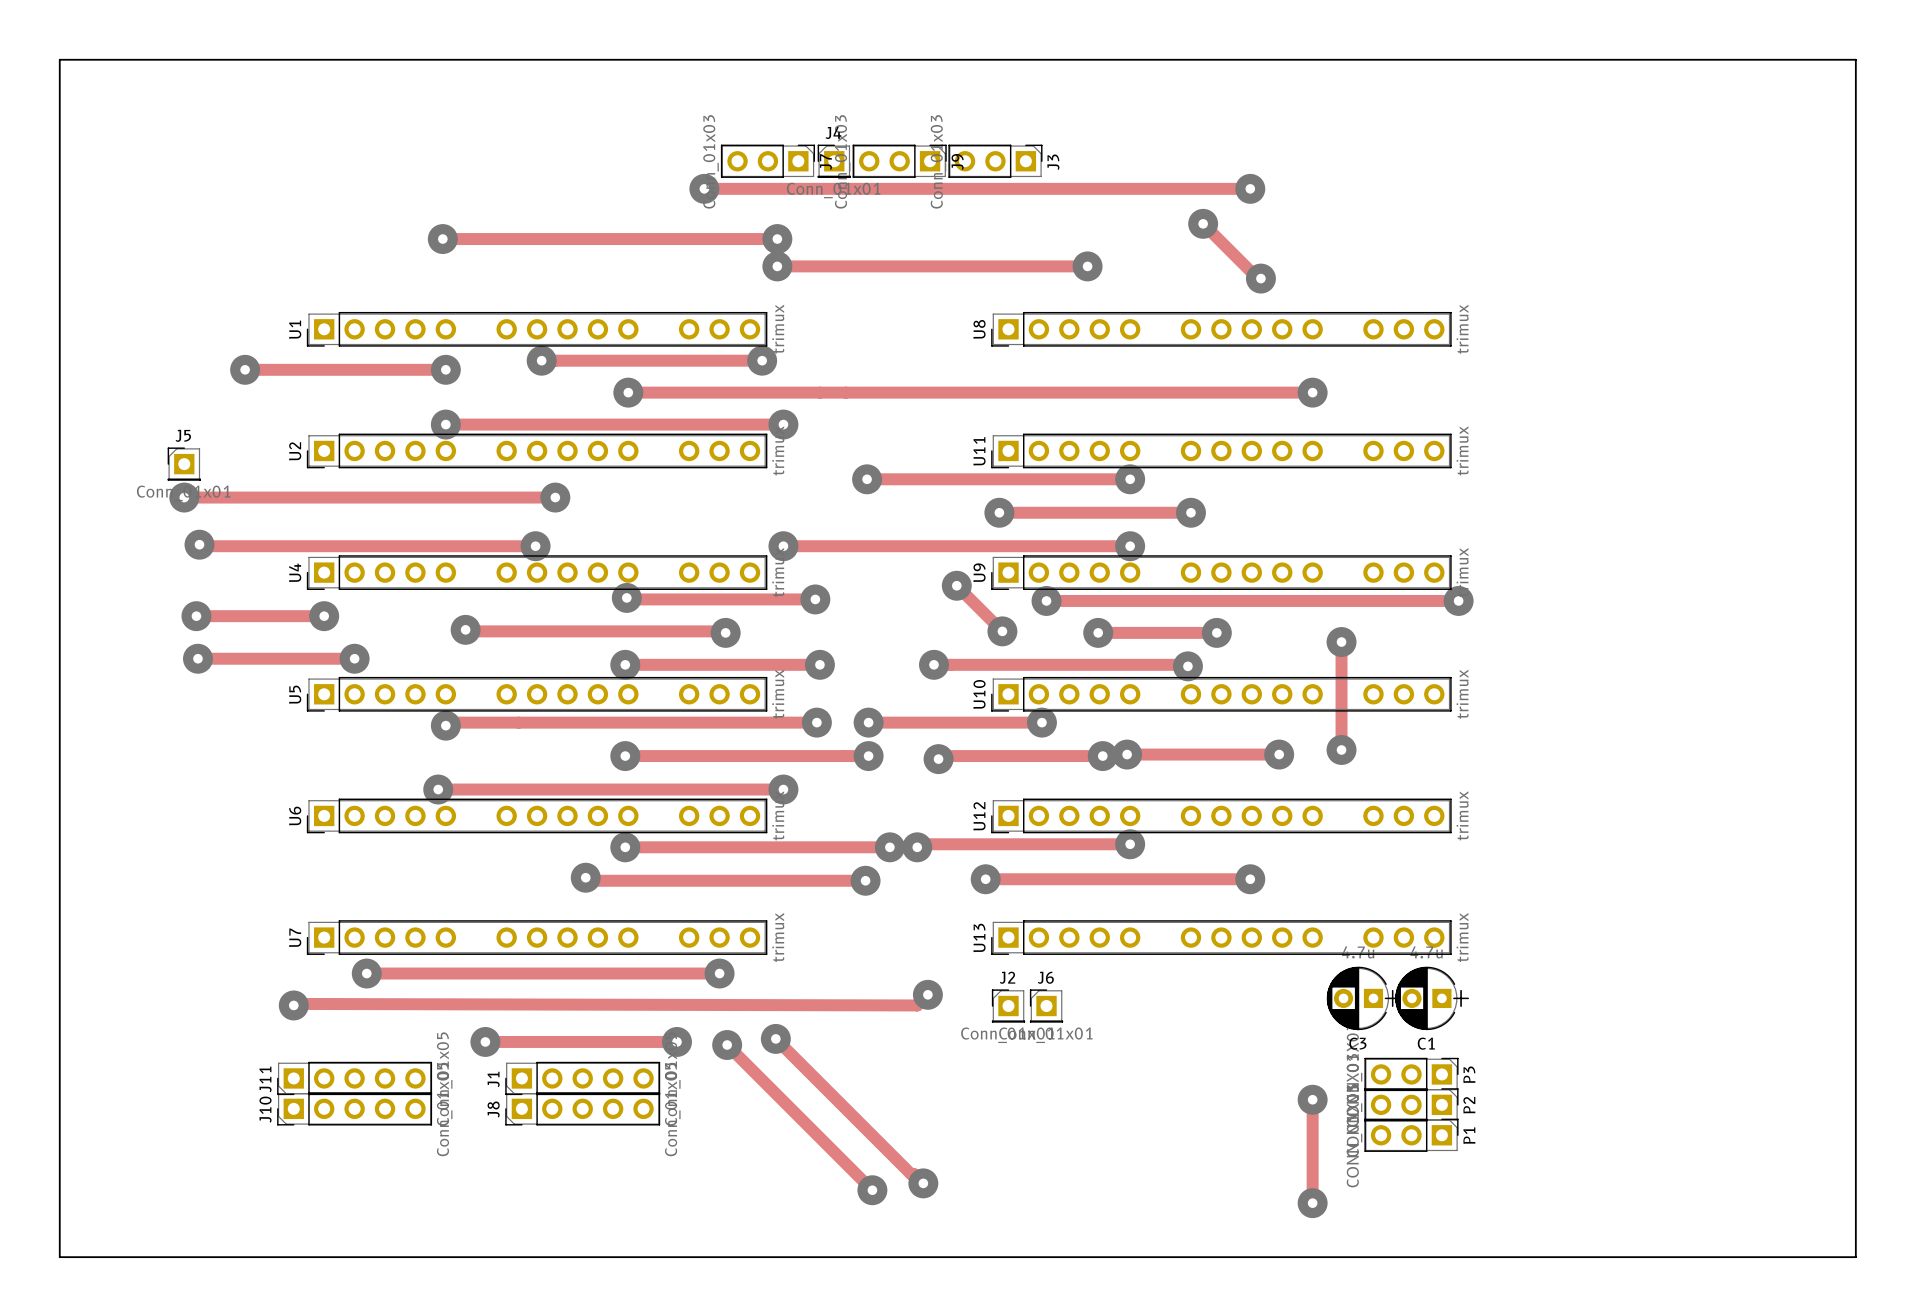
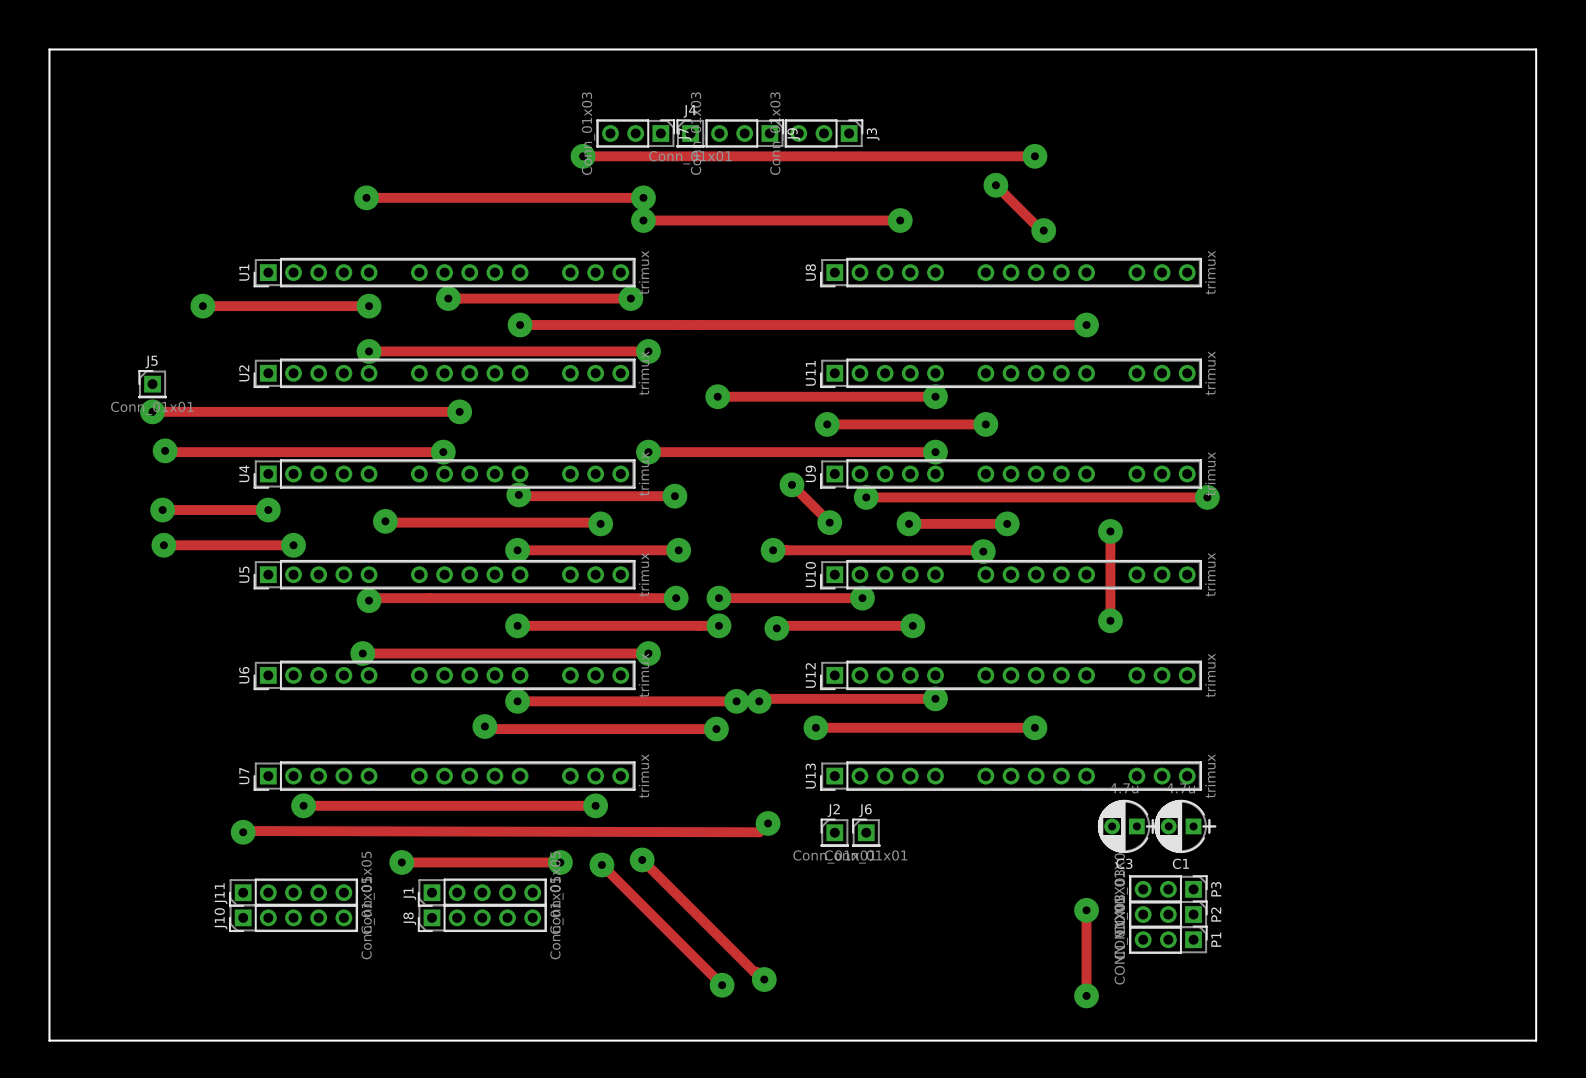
track: (1127, 754) (1279, 754) -> none
via: (1127, 754) -> none
via: (1279, 754) -> none

